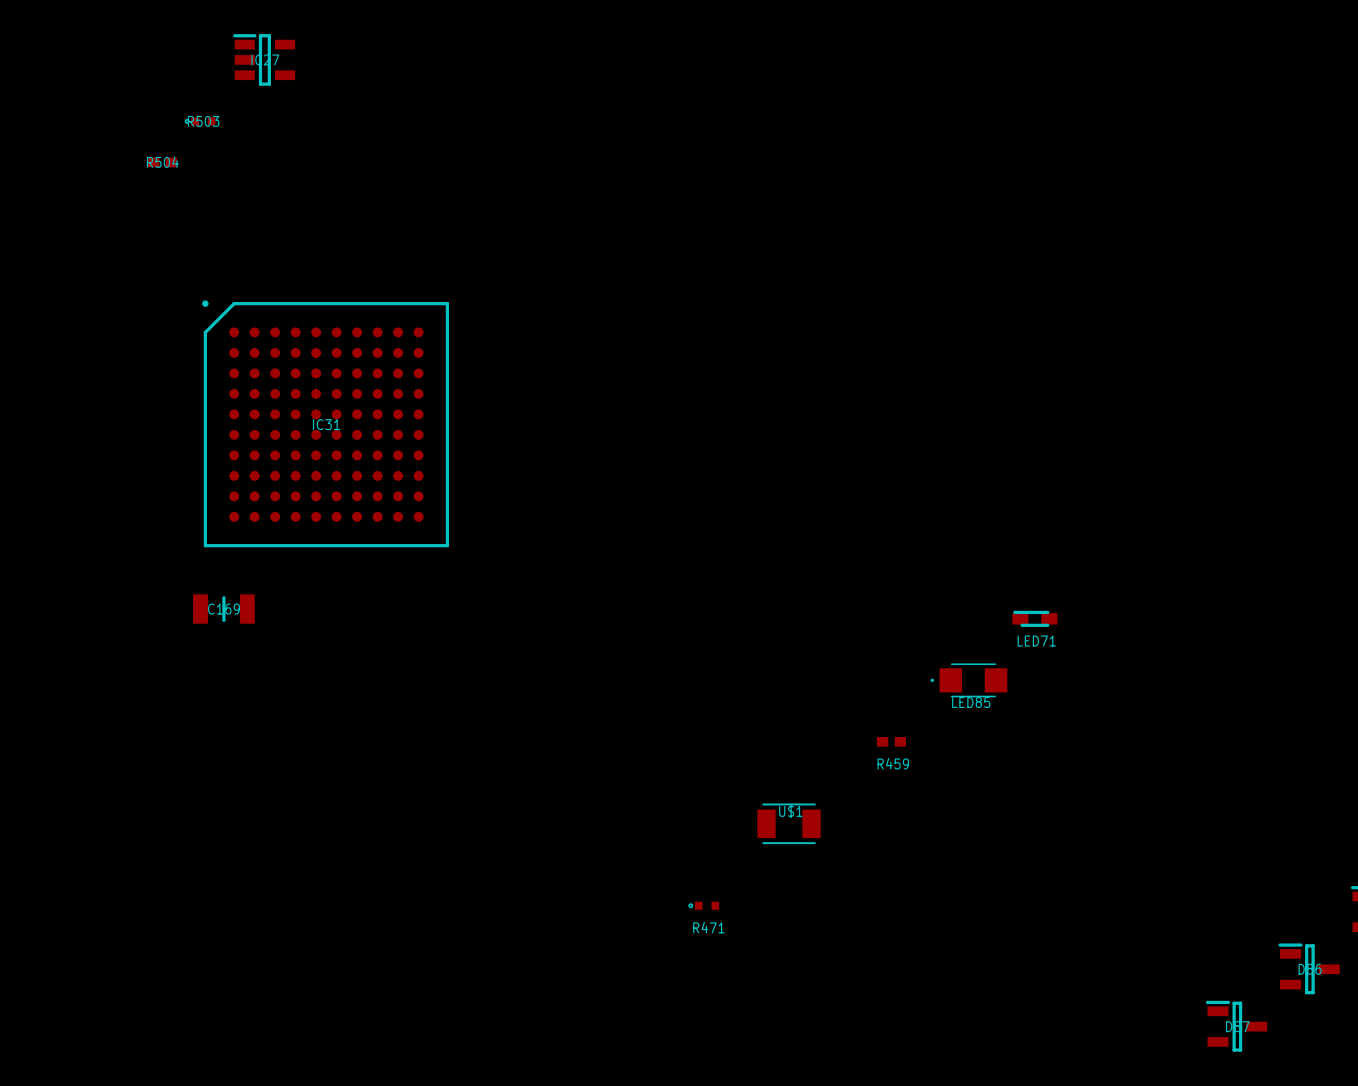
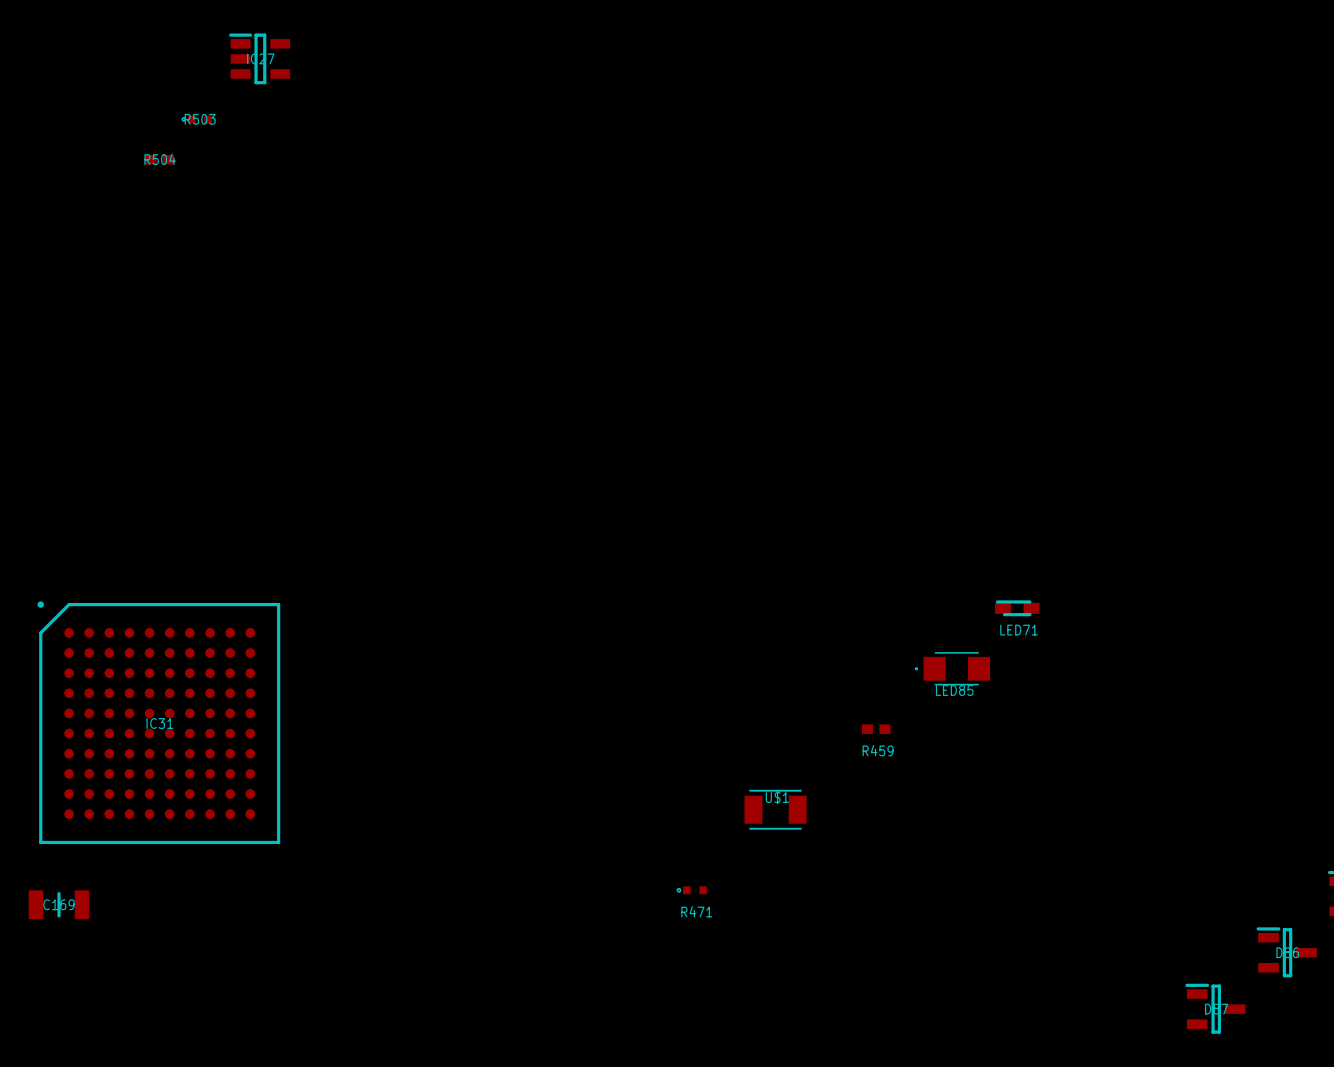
IC31 position: (325, 423) -> (158, 722)
C169 position: (223, 609) -> (58, 904)

